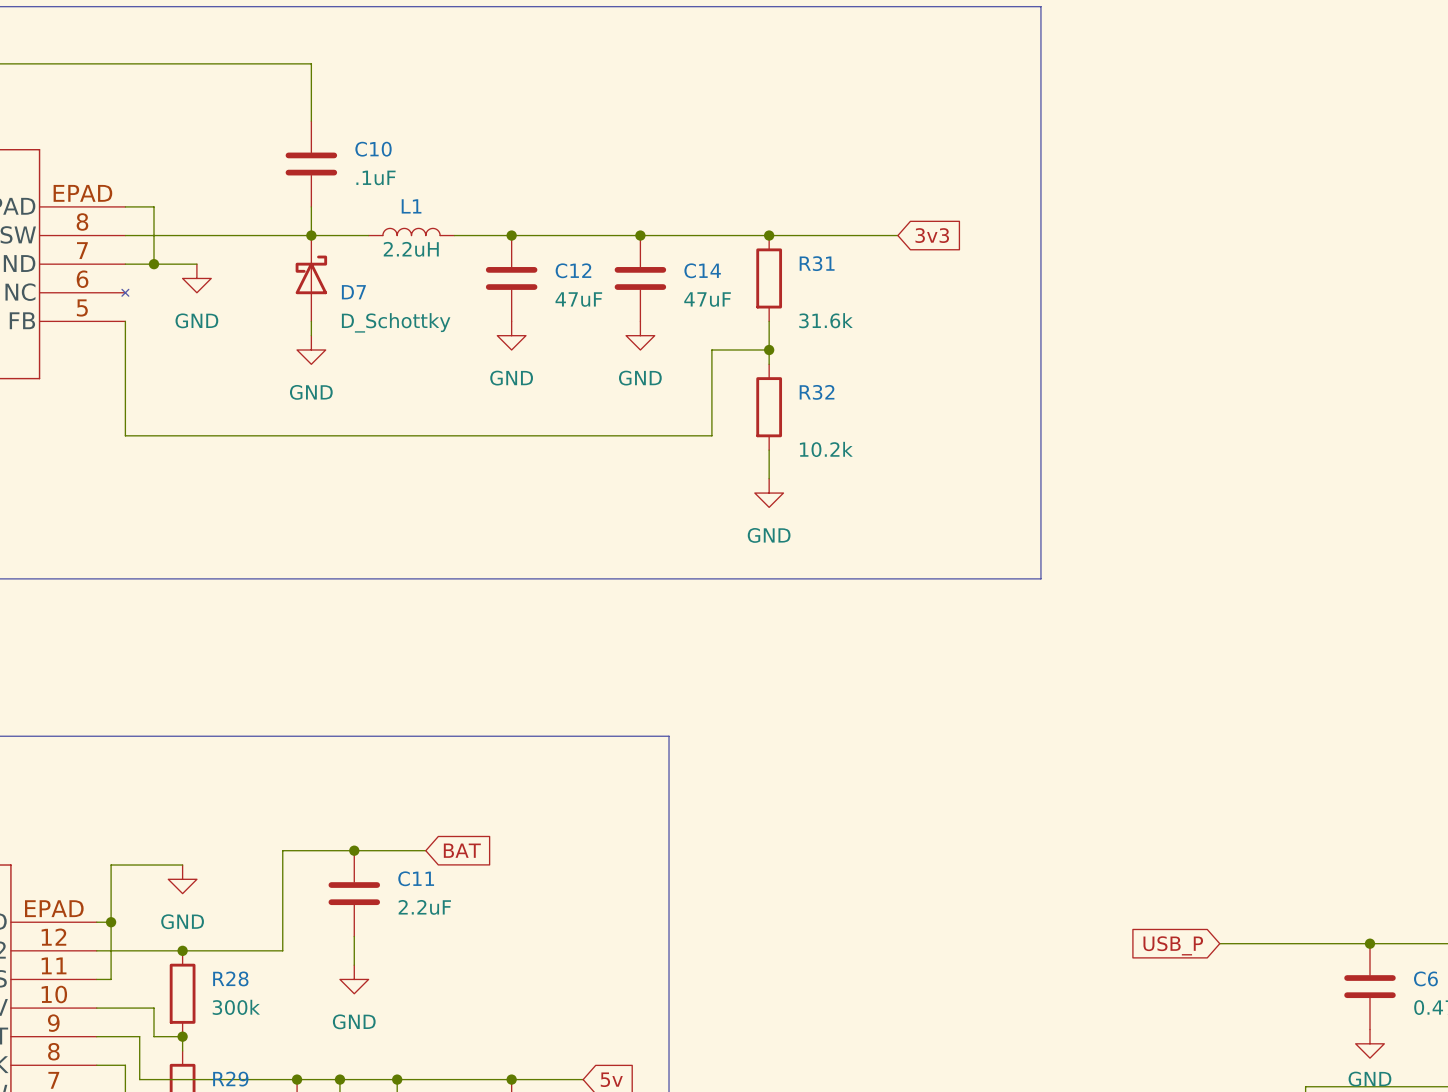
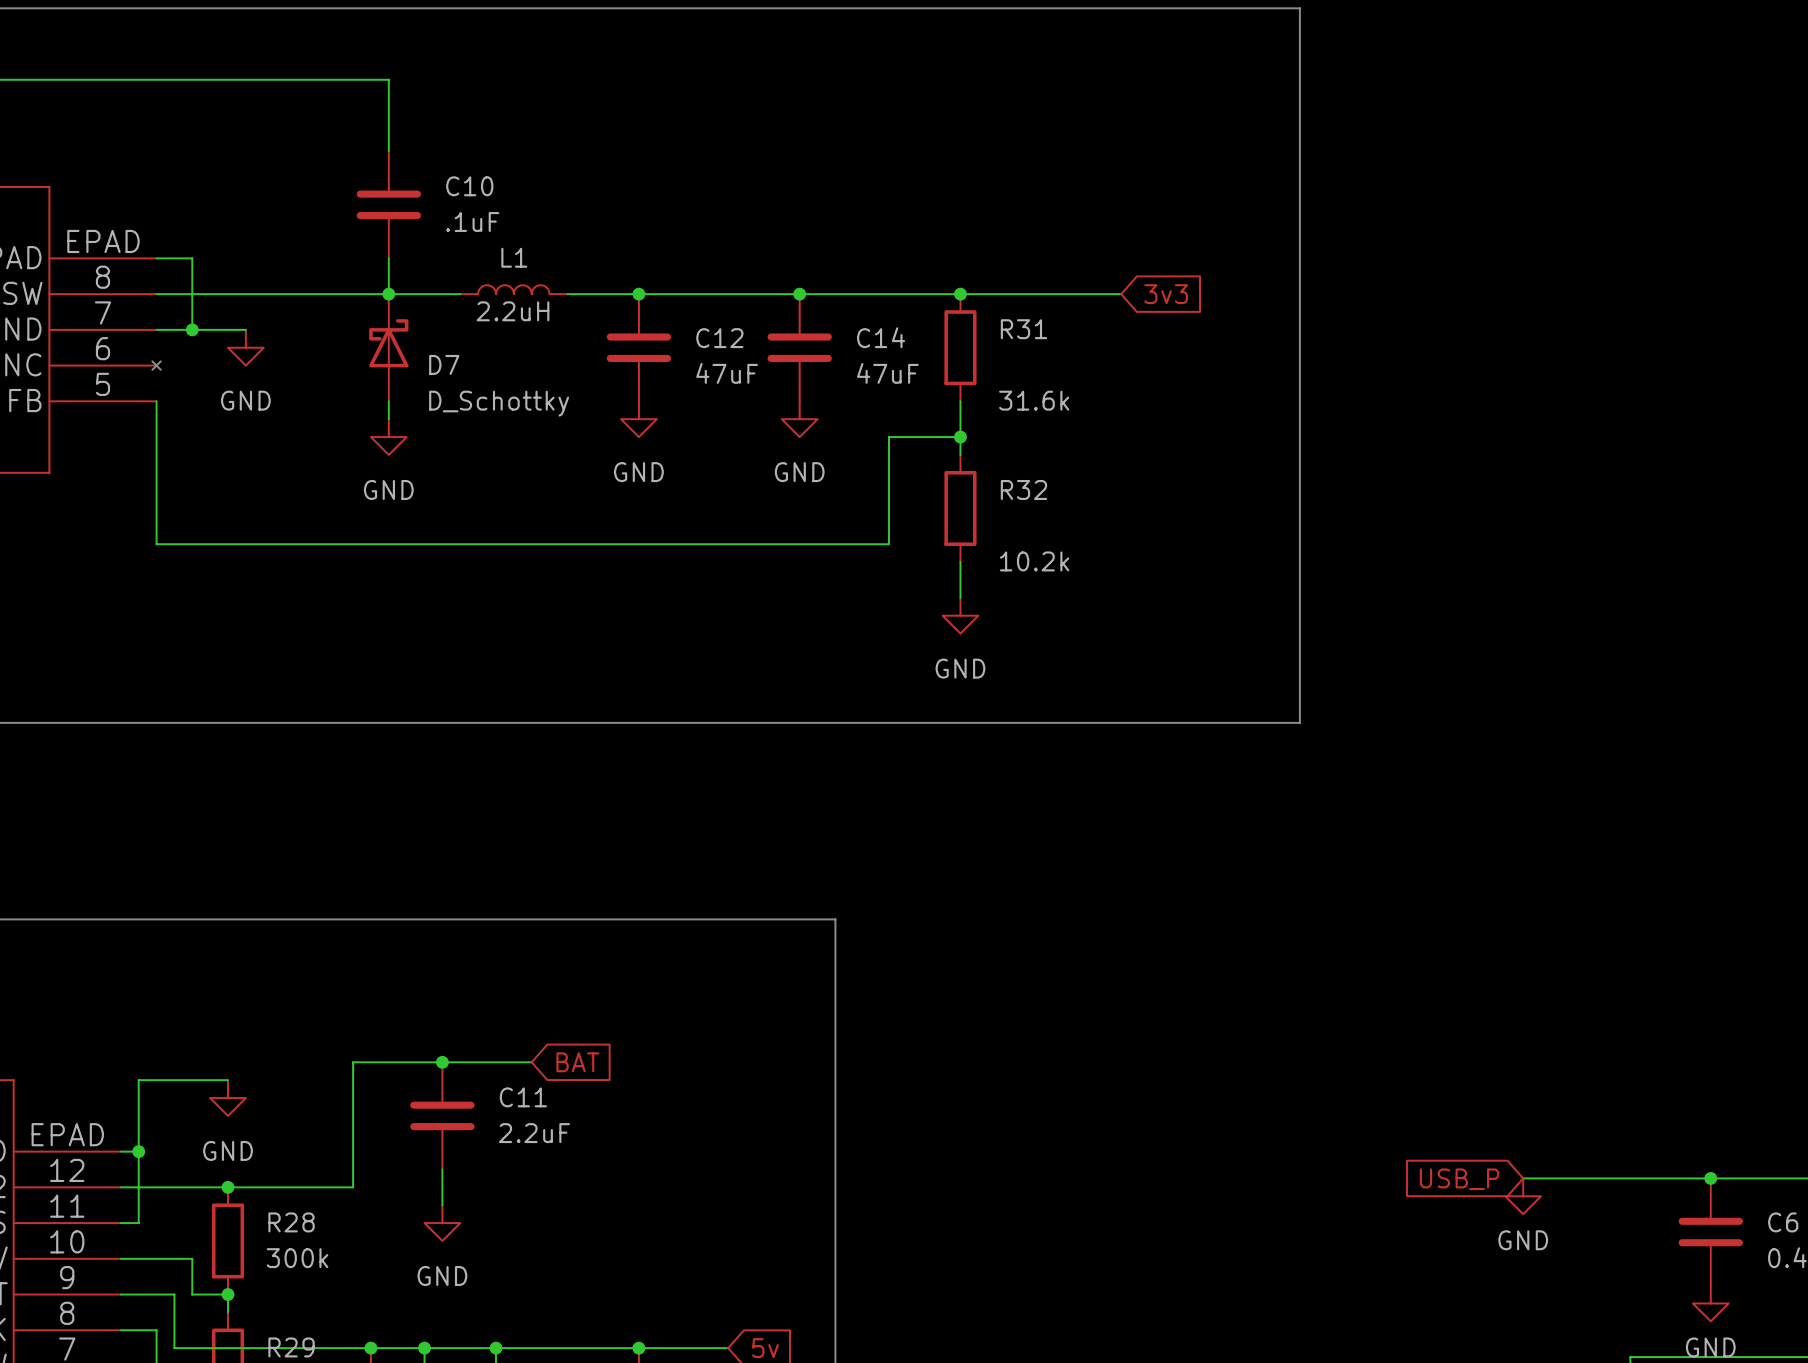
power symbol: none -> GND (1523, 1196)

